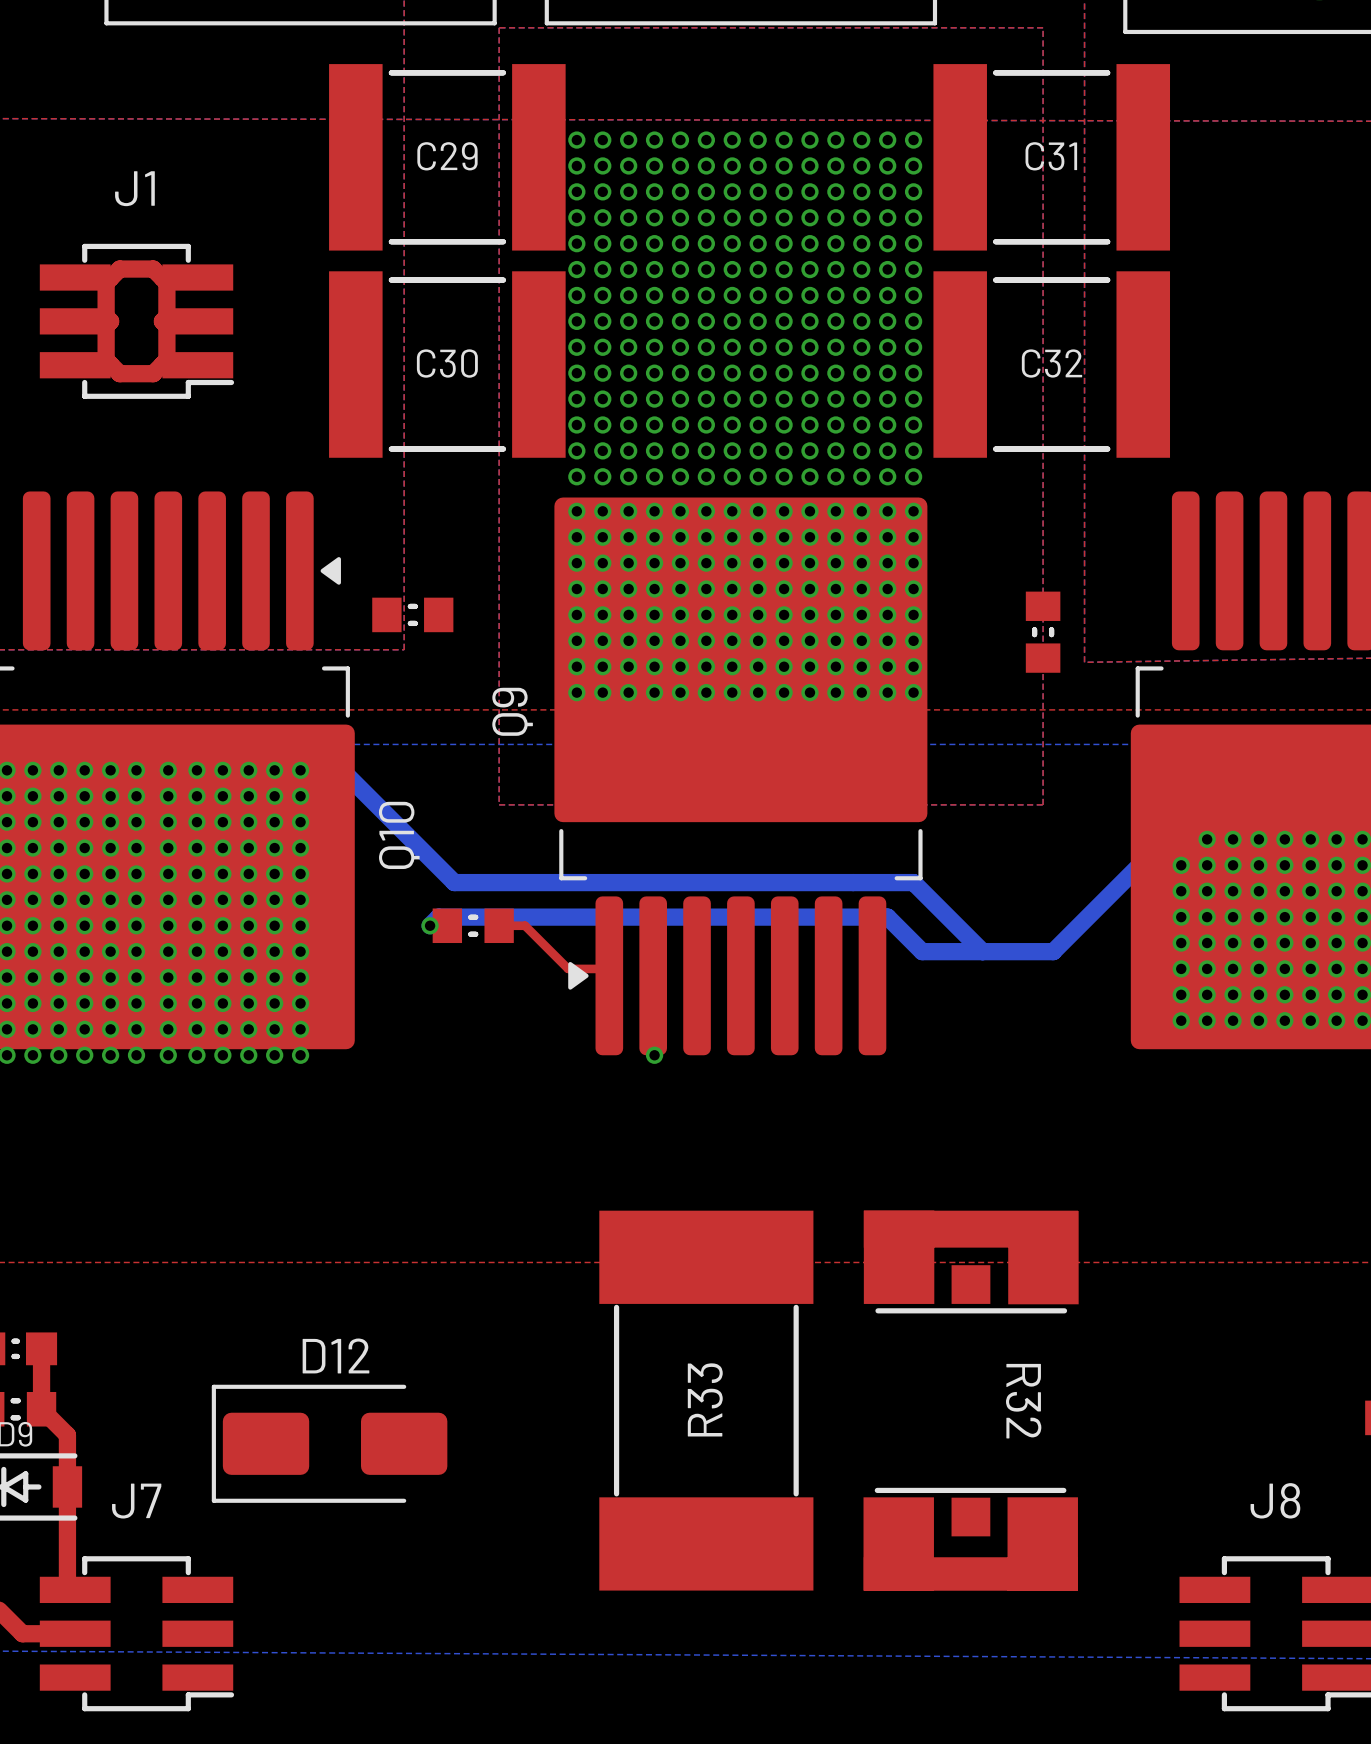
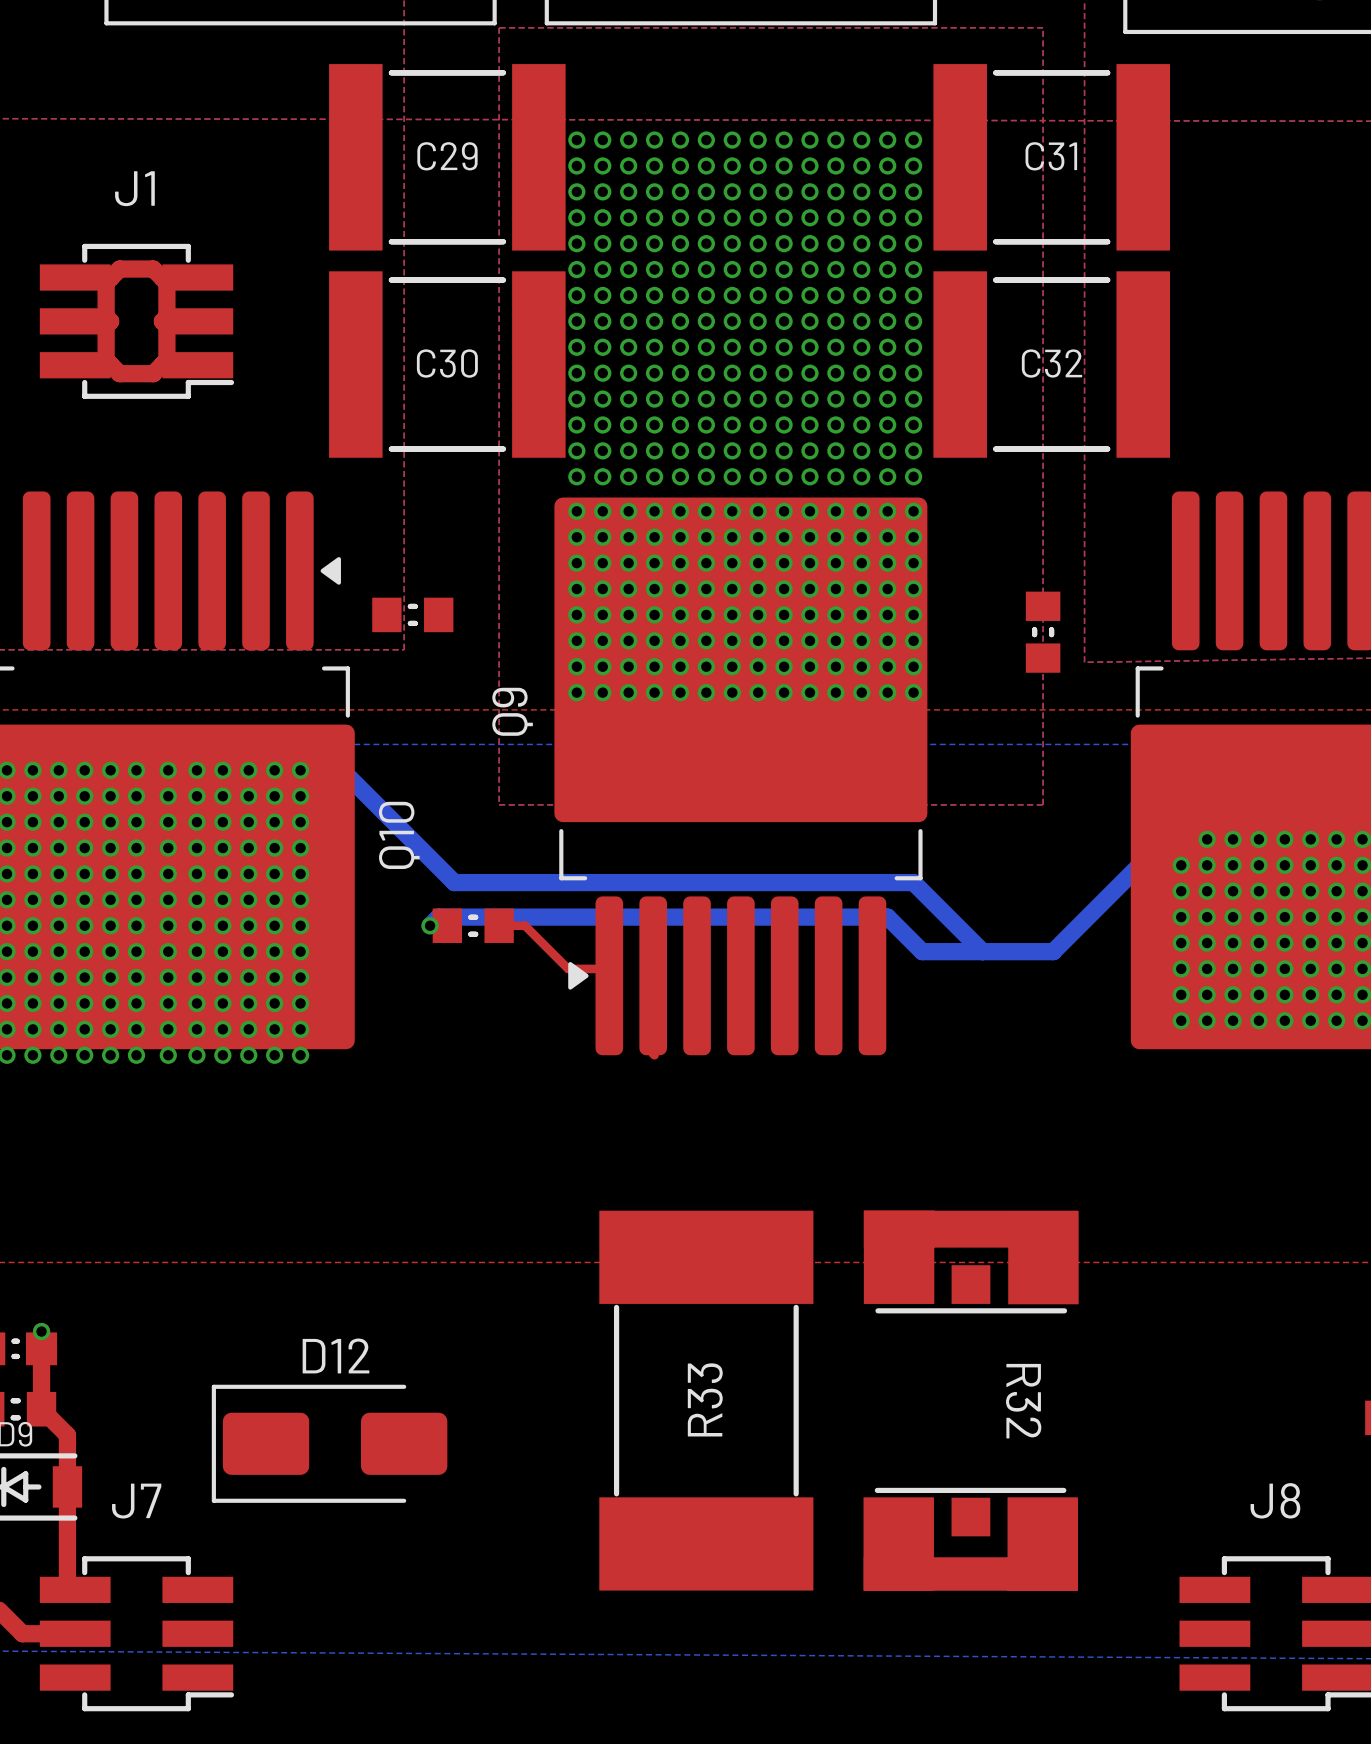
via: (654, 1055) -> none
via: none -> (41, 1331)

